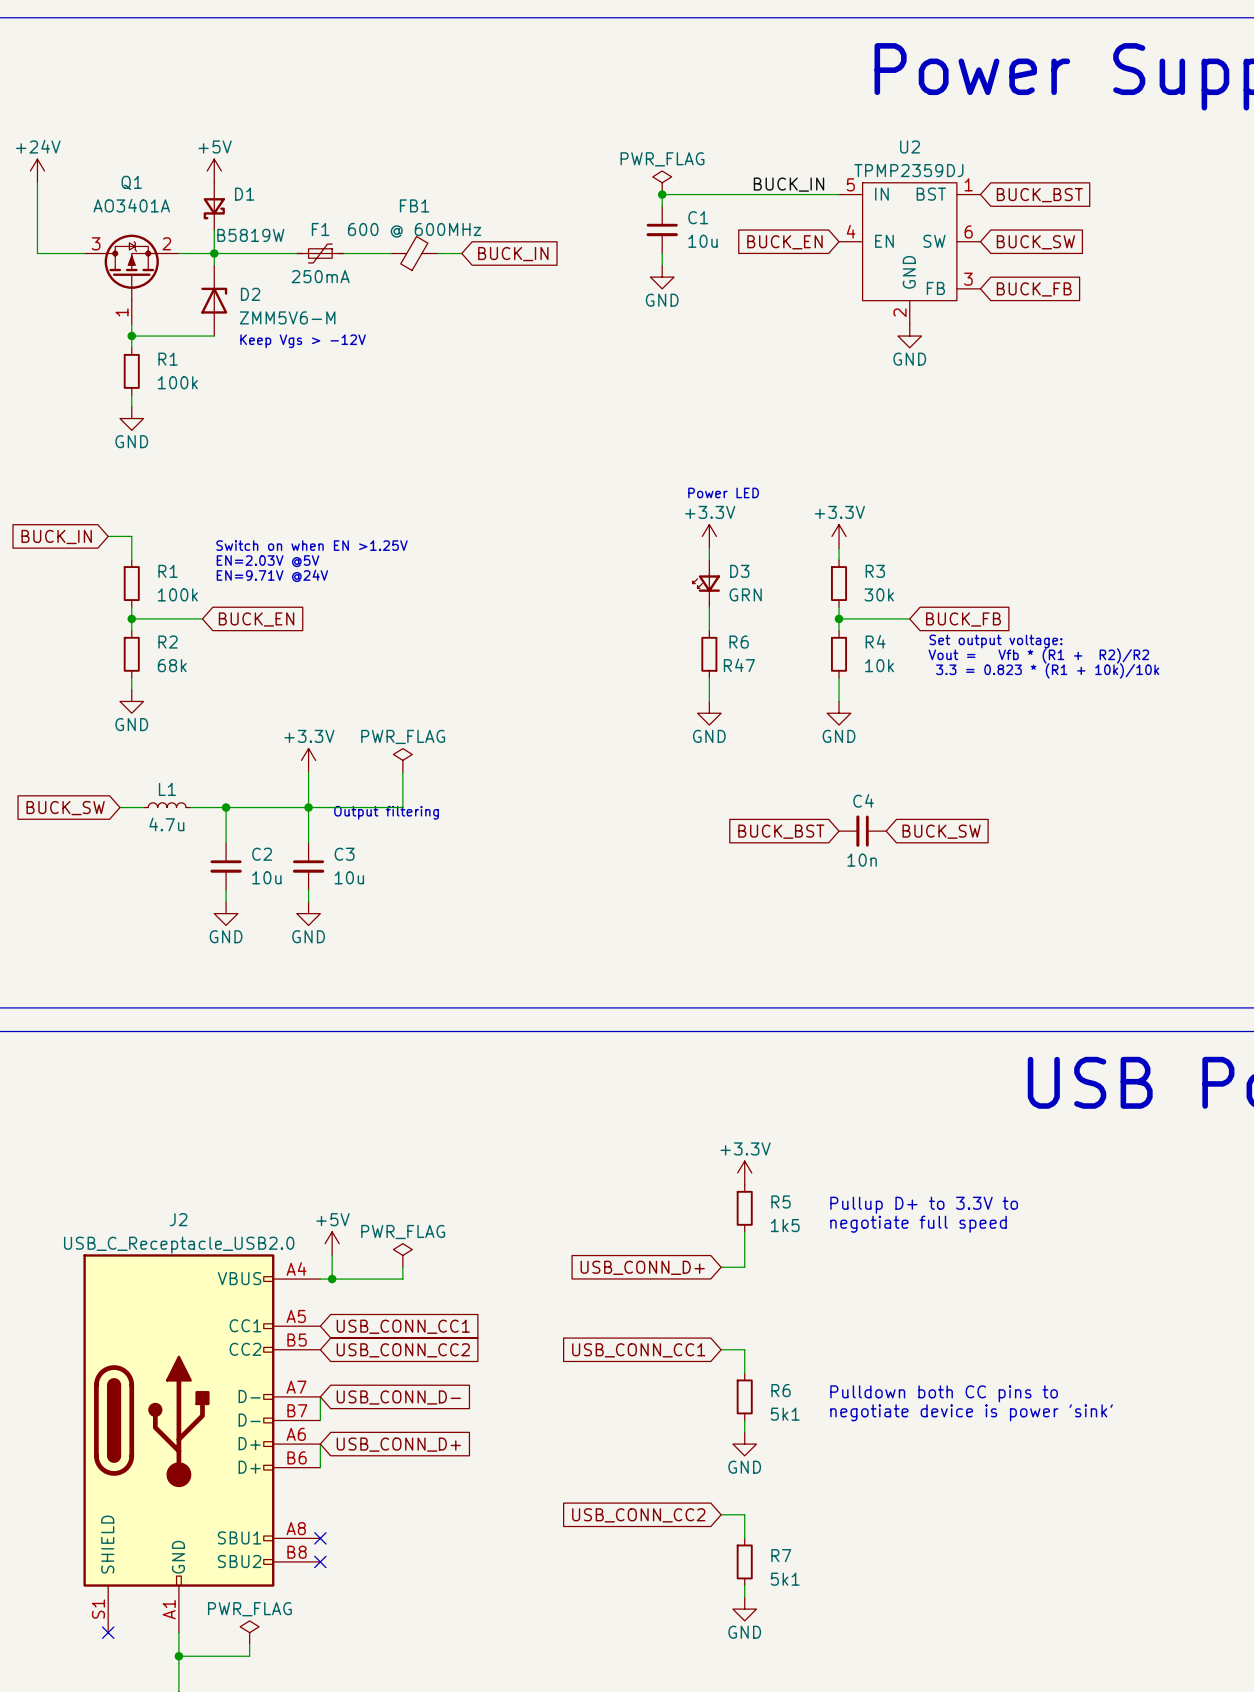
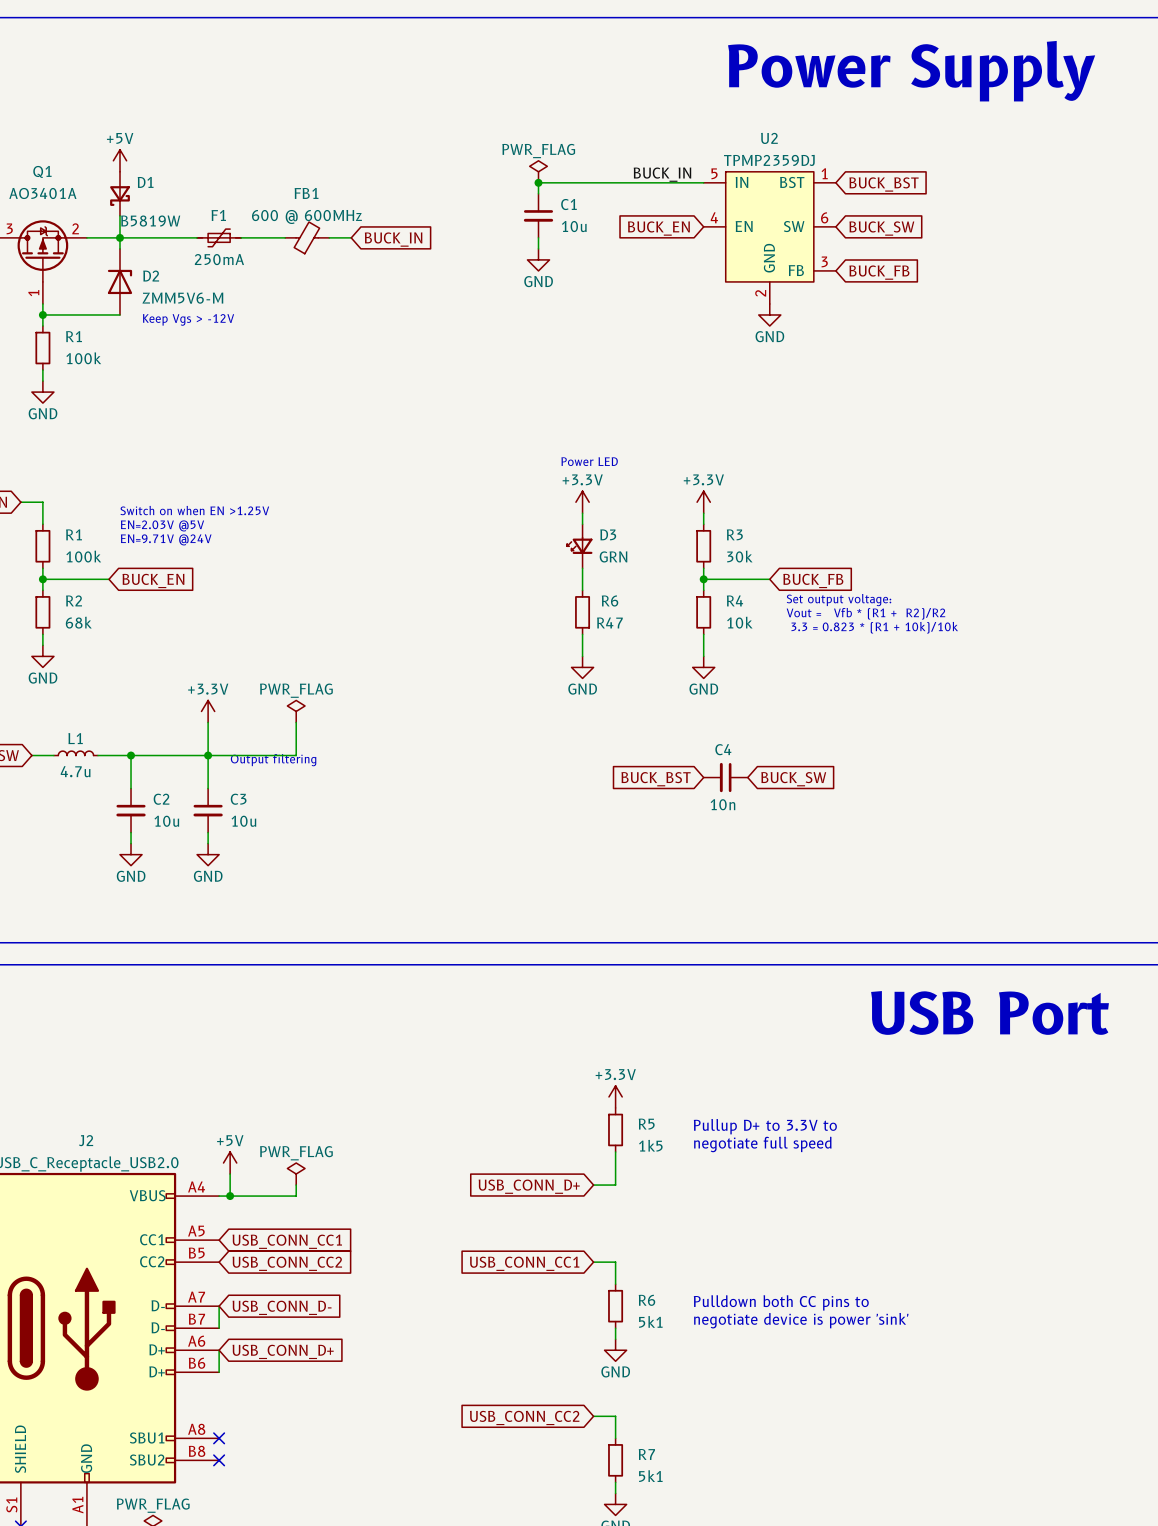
U2 symbol: [839, 182, 981, 325] -> [703, 171, 836, 304]

